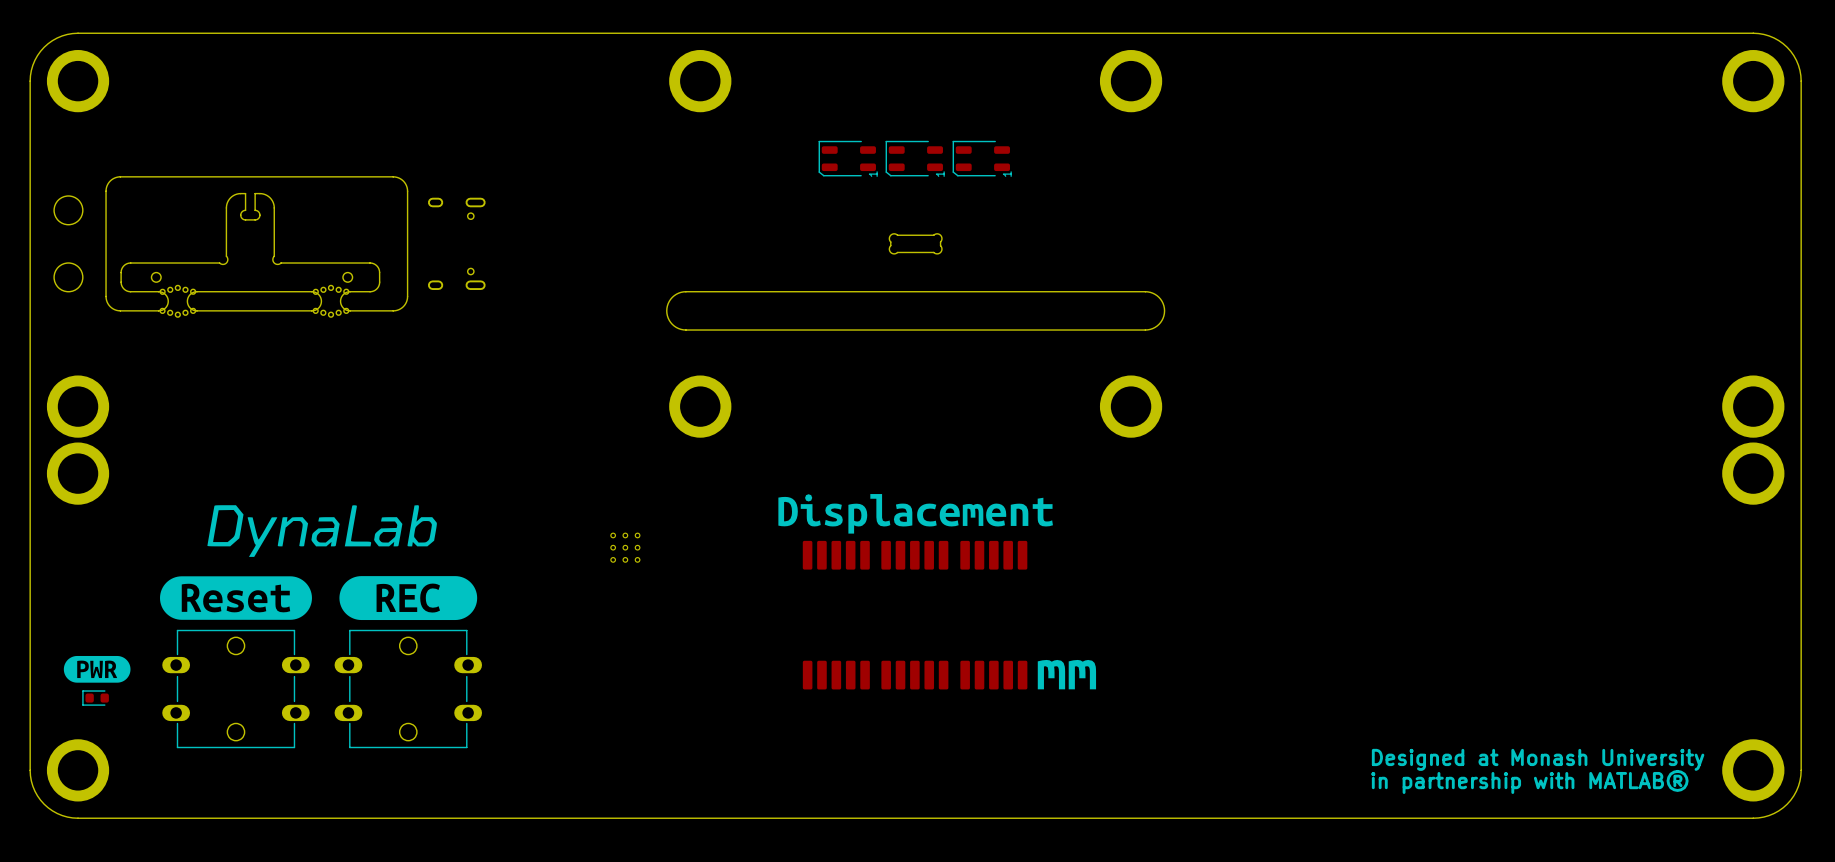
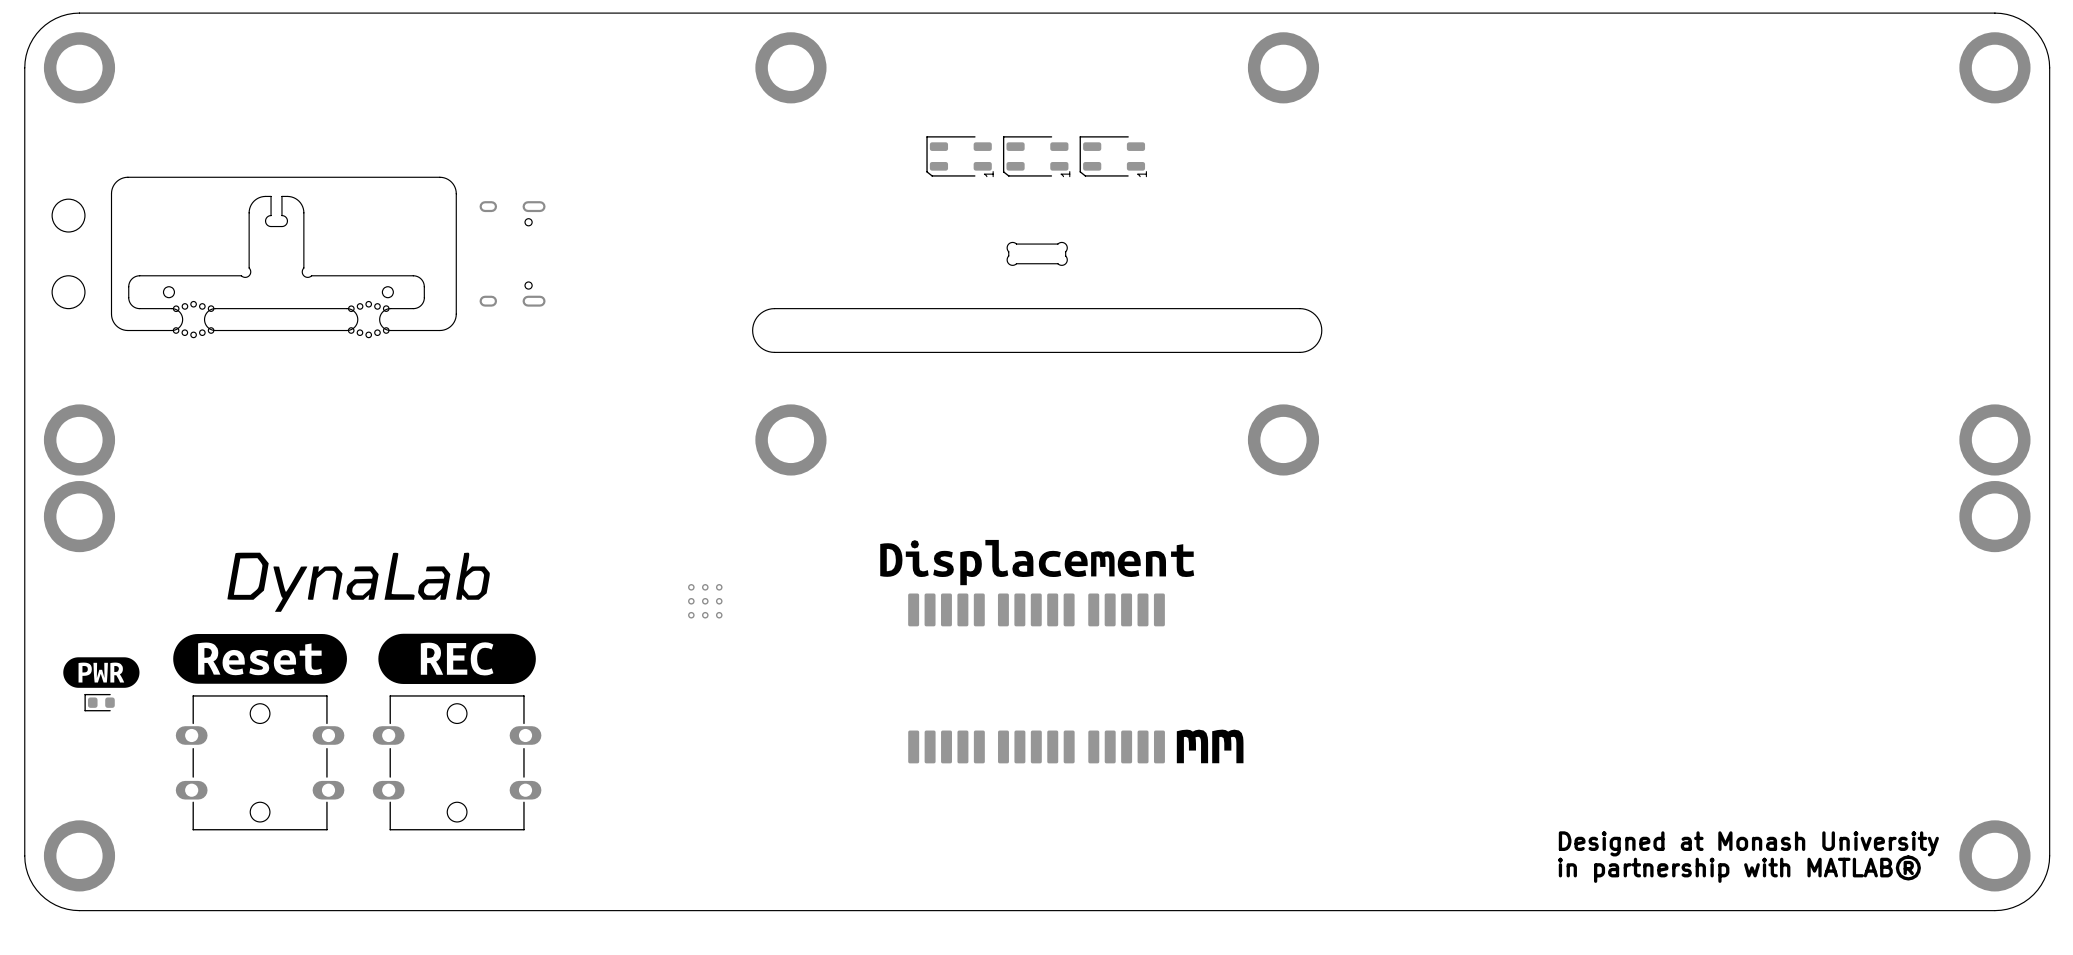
drawing position: (97, 669) -> (101, 672)
part position: (95, 698) -> (99, 702)

